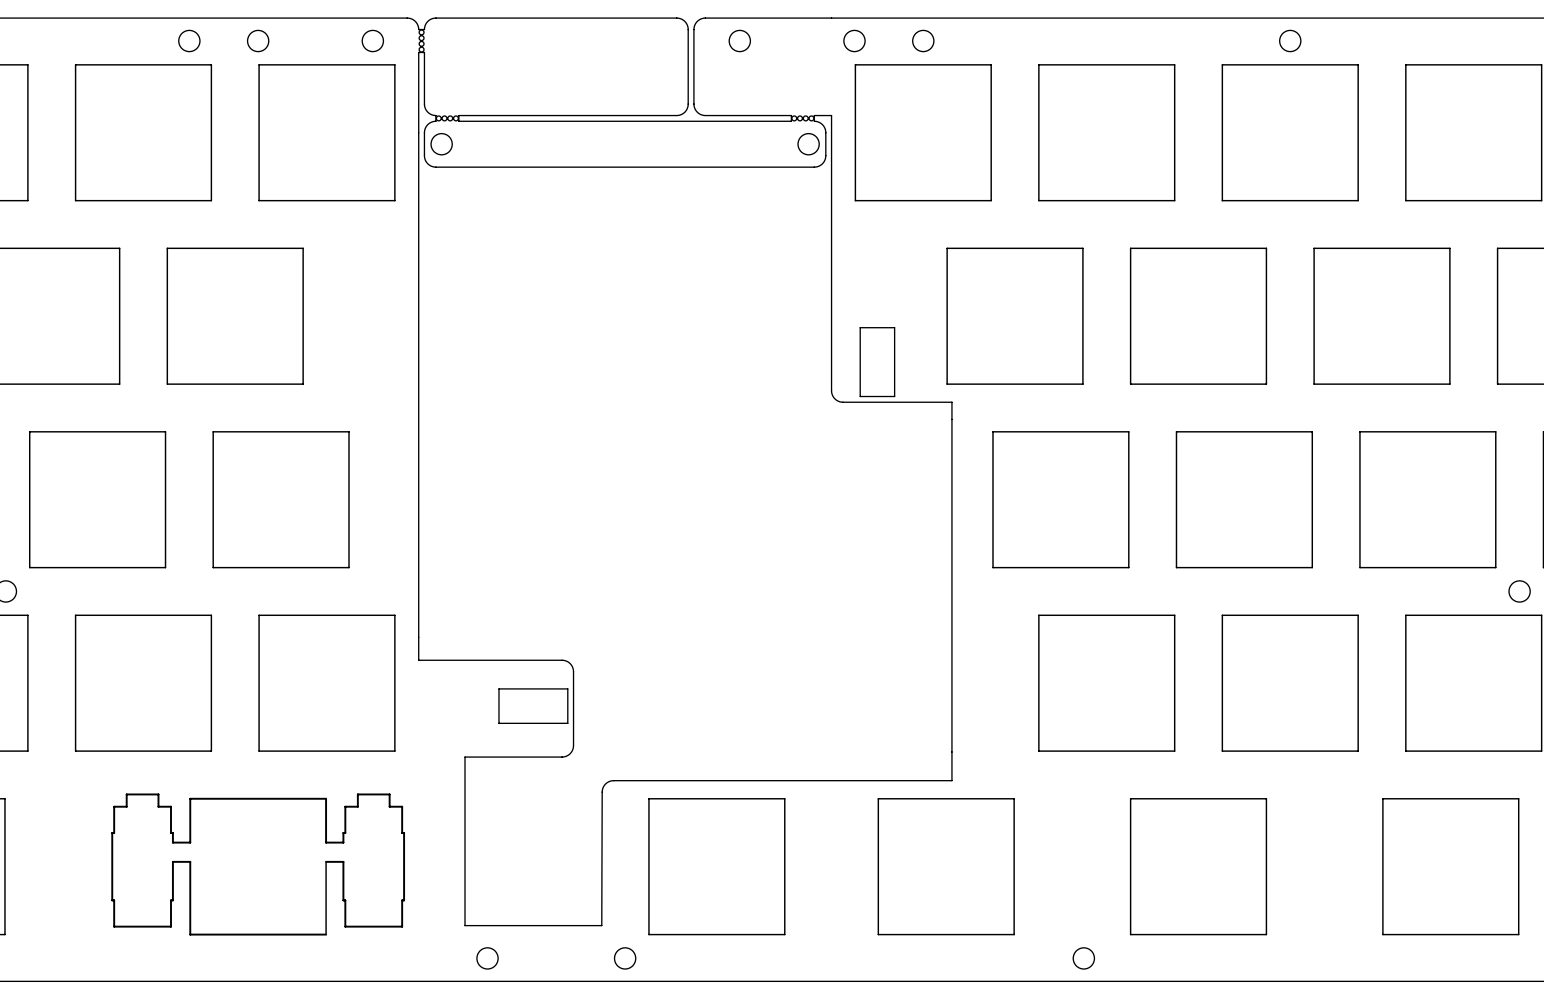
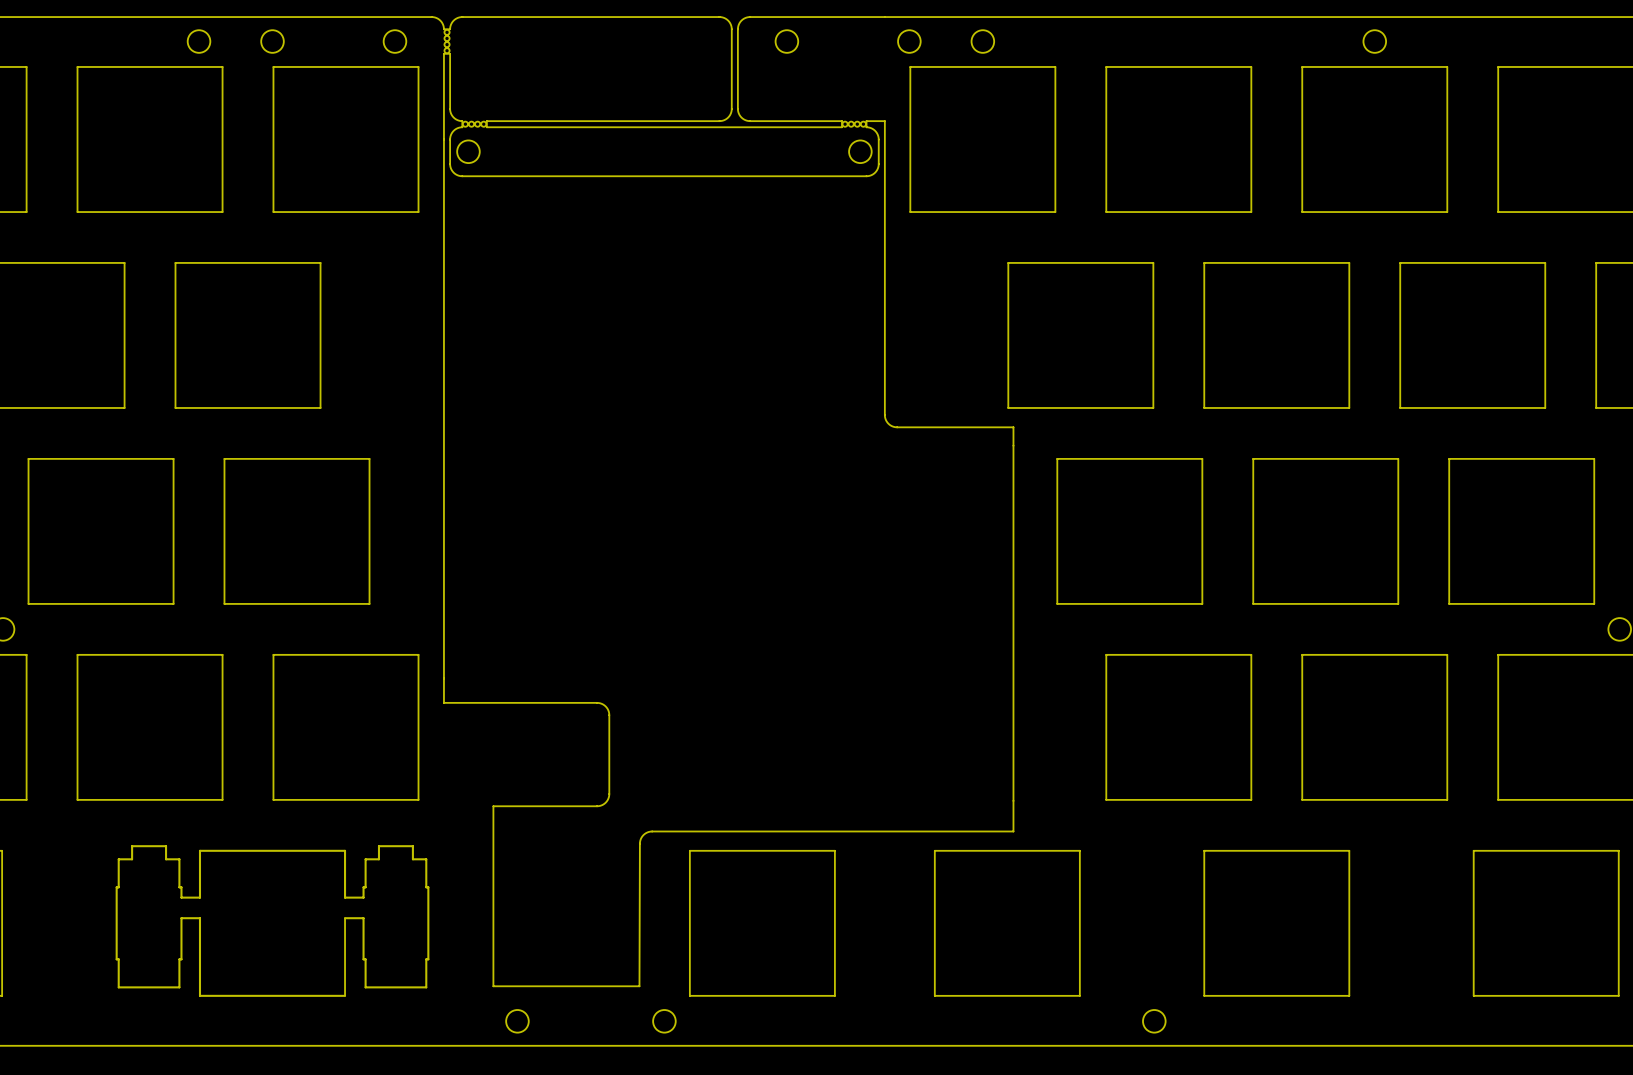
board edge: (860, 327) (860, 396) (894, 396) (894, 327) (860, 327) -> none
board edge: (498, 688) (567, 688) (567, 723) (498, 723) (498, 688) -> none

